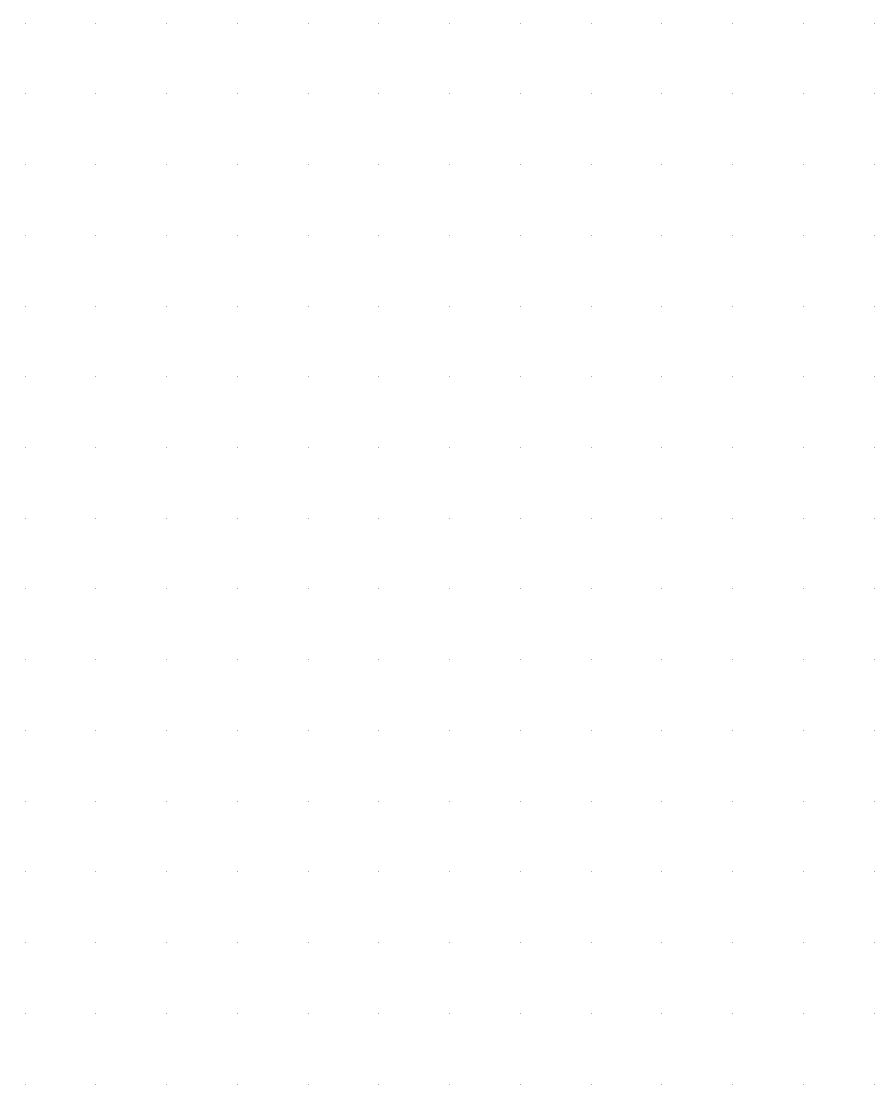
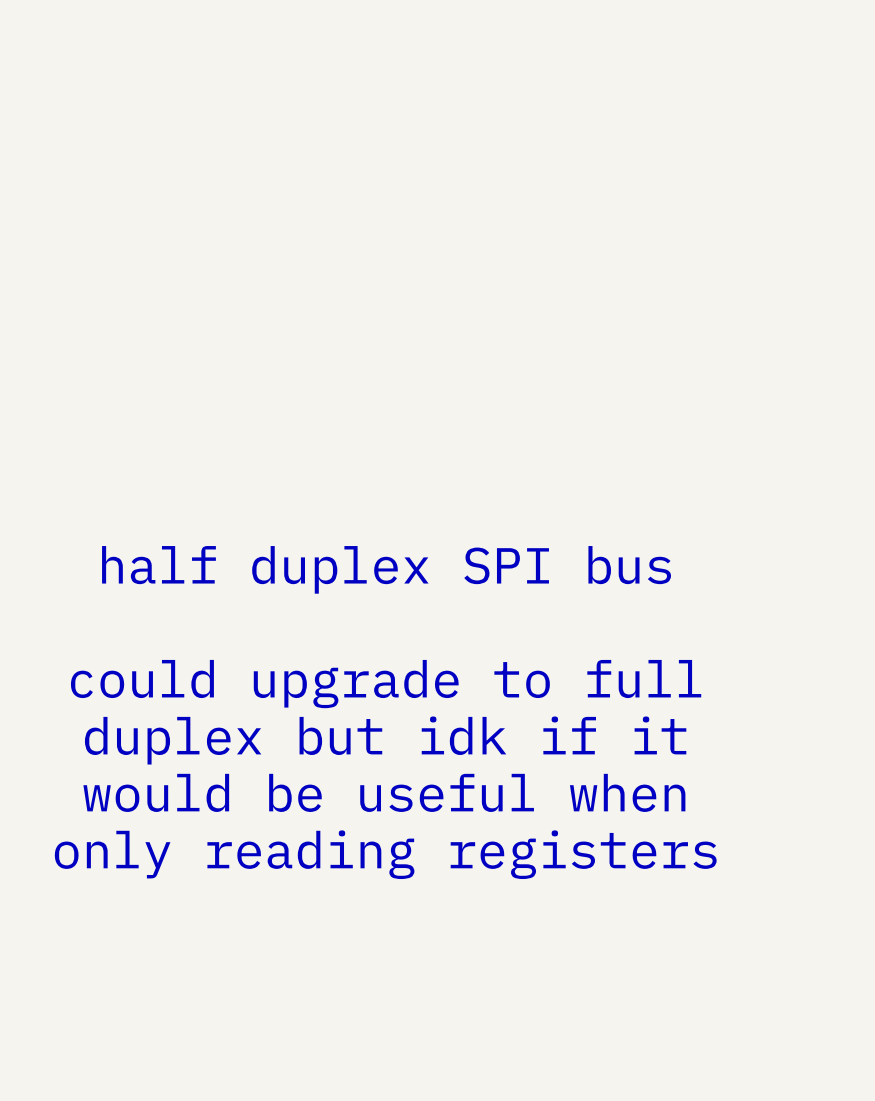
text: none -> half duplex SPI bus (386, 569)
text: none -> could upgrade to full (386, 684)
text: none -> duplex but idk if it (385, 740)
text: none -> would be useful when (384, 792)
text: none -> only reading registers (385, 854)

